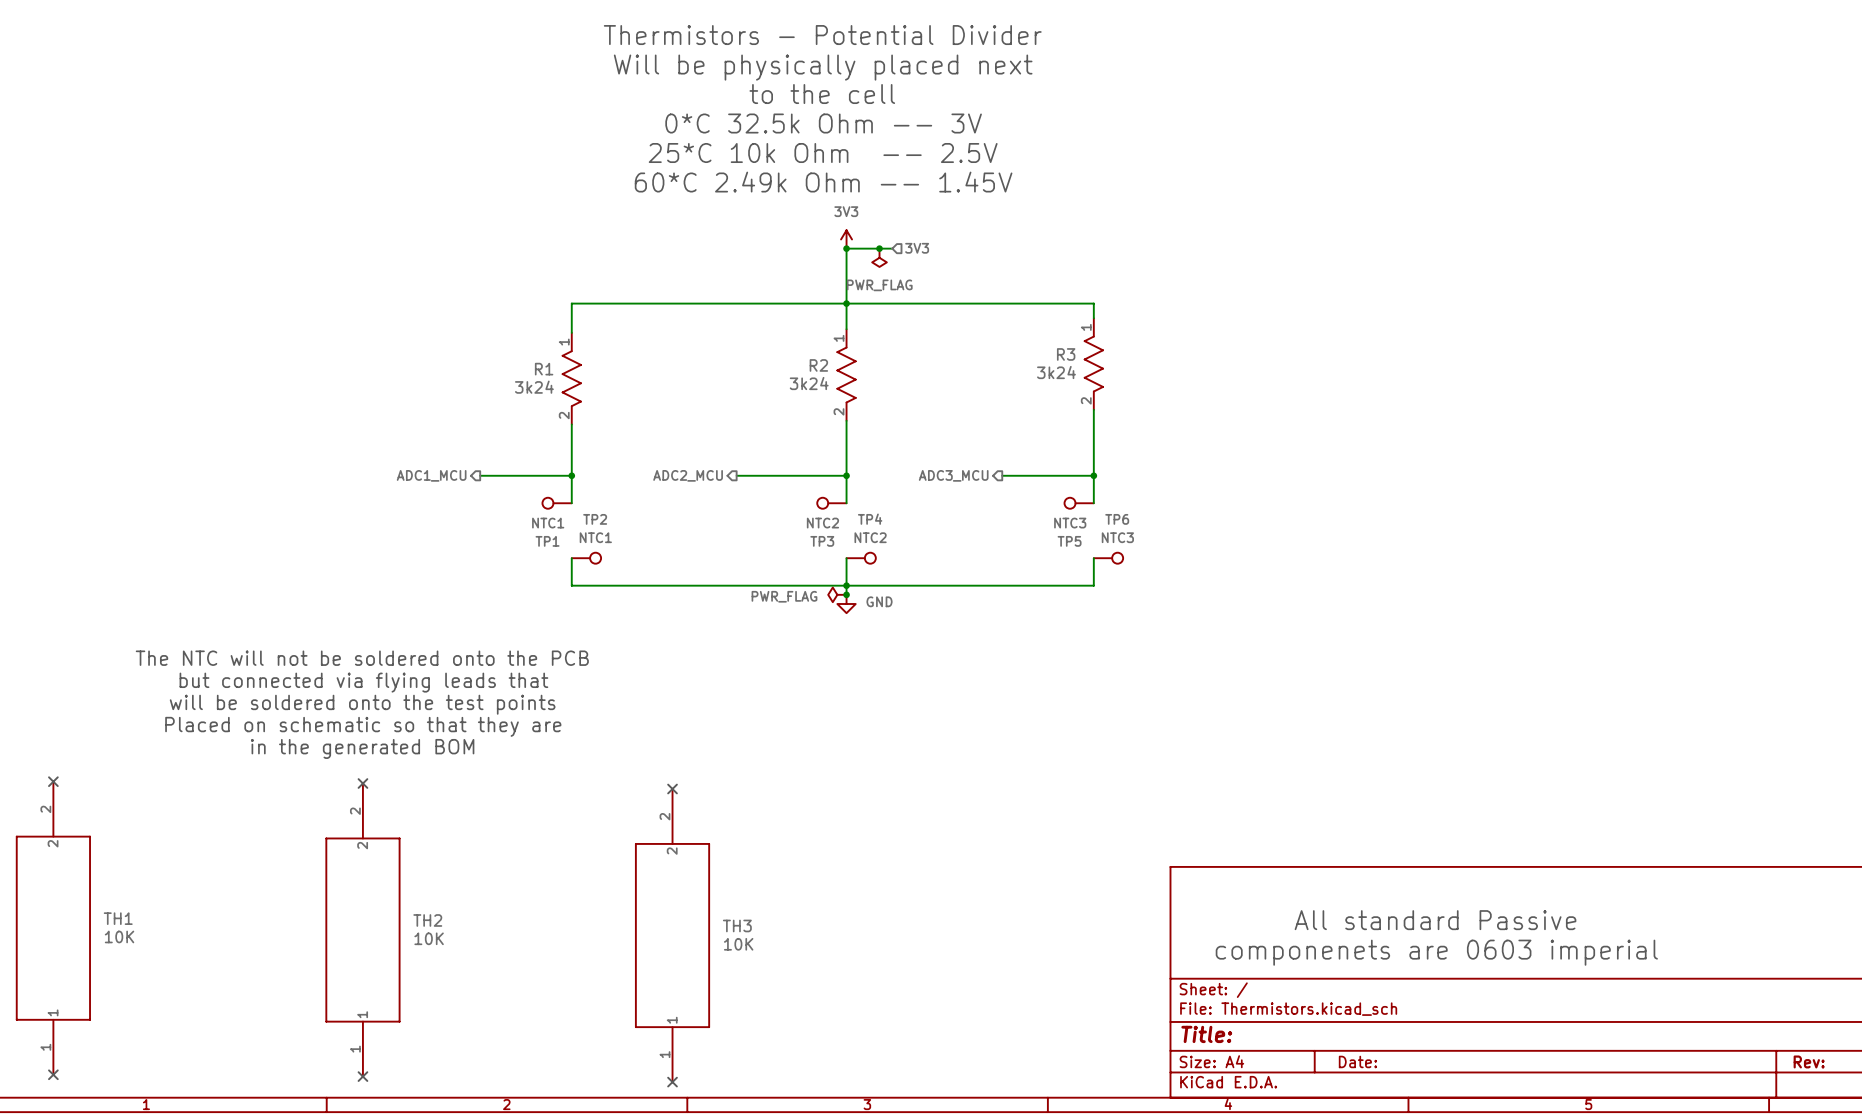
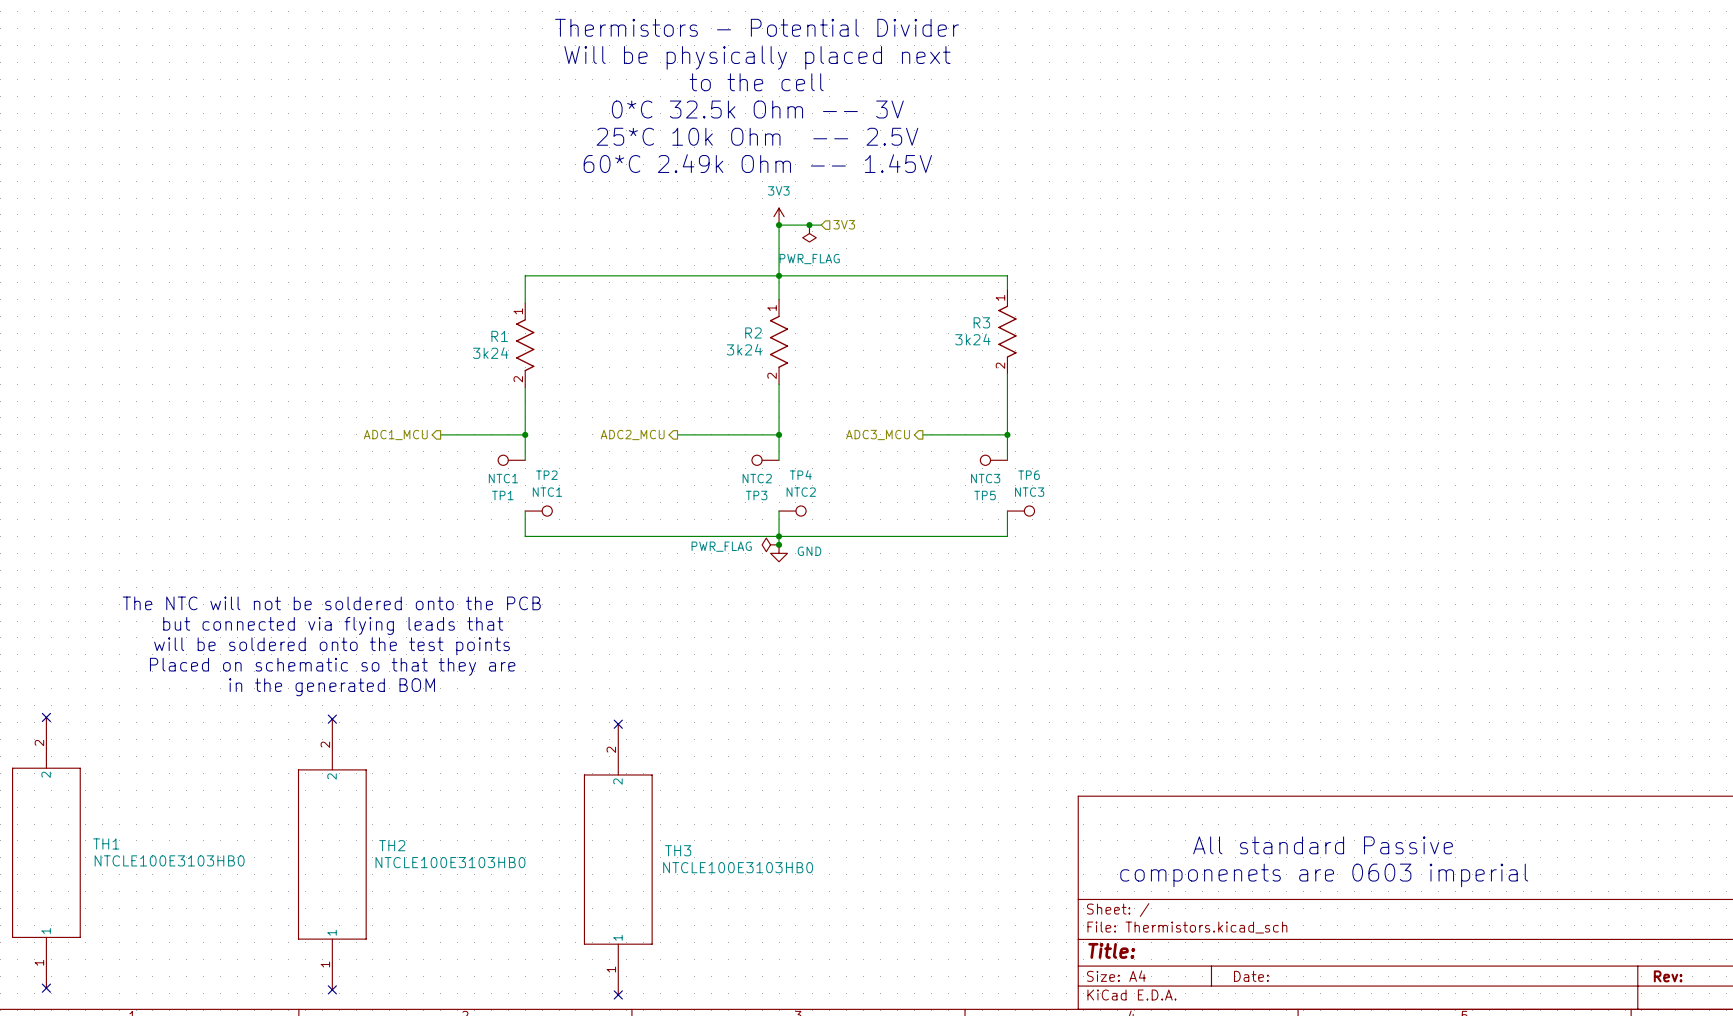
TH1 value: 10K (119, 936) -> NTCLE100E3103HB0 (169, 860)
TH2 value: 10K (429, 938) -> NTCLE100E3103HB0 (450, 862)
TH3 value: 10K (738, 944) -> NTCLE100E3103HB0 (738, 867)

